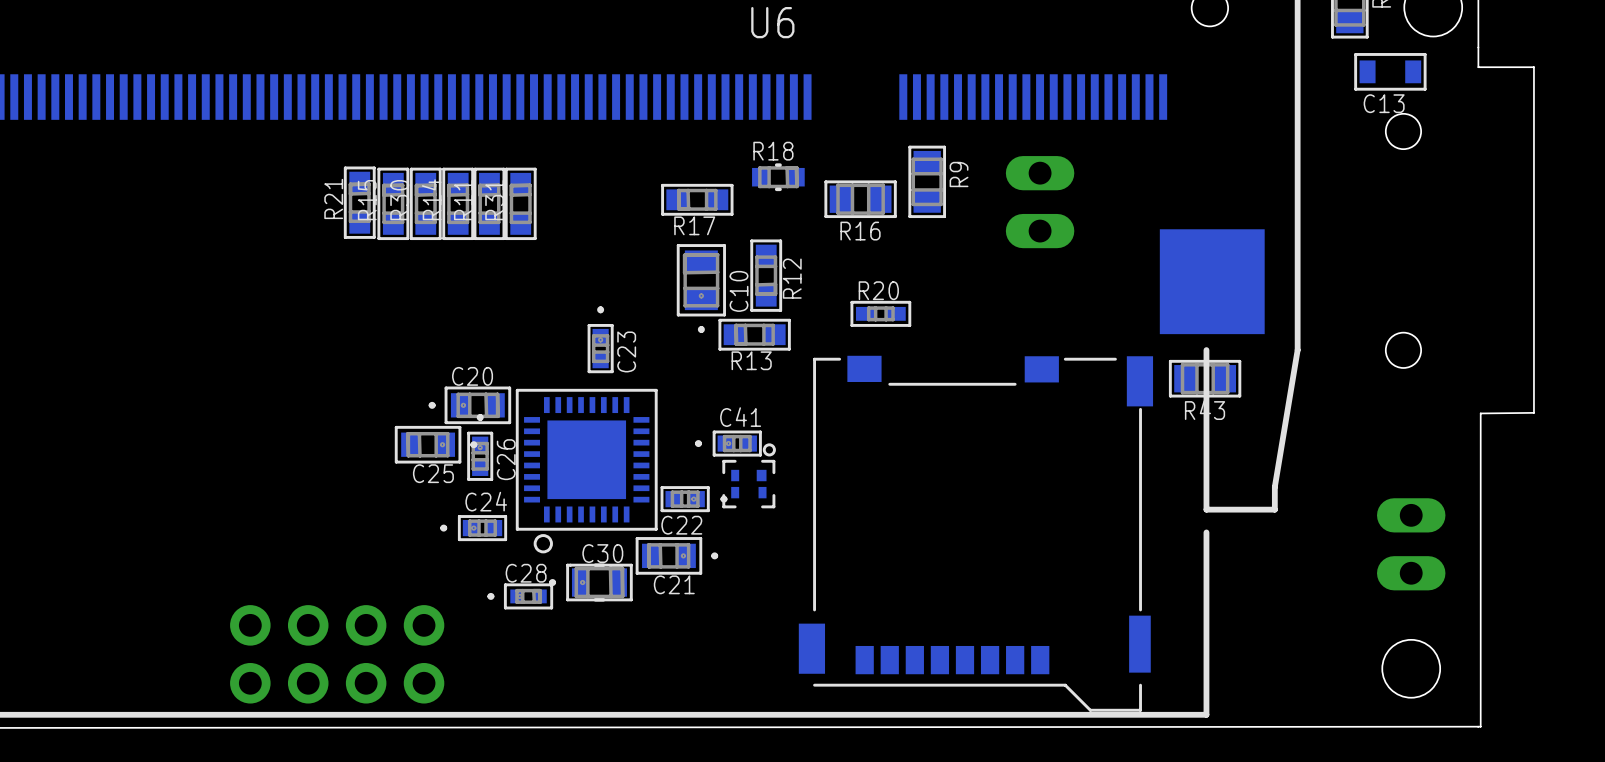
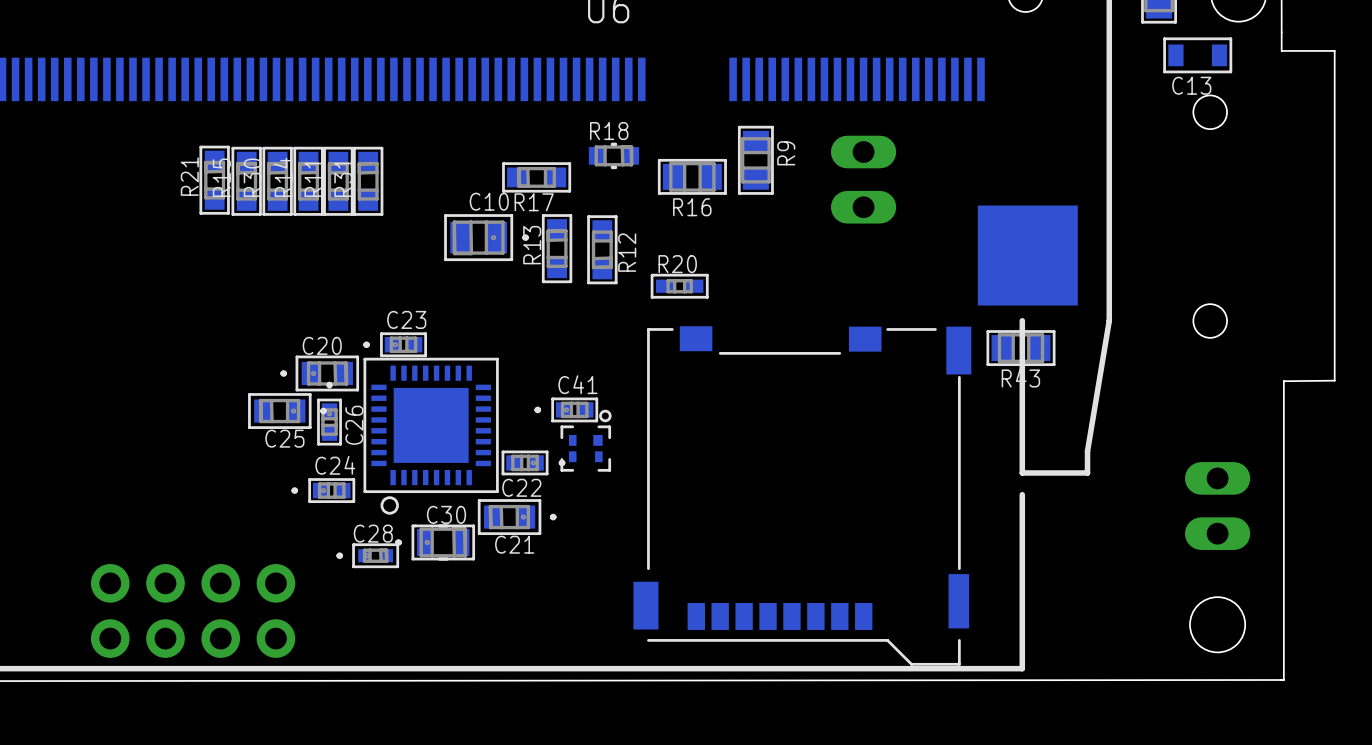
C10 rotation: 0° (701, 288) -> 90° counterclockwise (486, 237)
C10 position: (701, 288) -> (486, 237)
R20 position: (880, 313) -> (679, 286)
R13 rotation: 0° (754, 334) -> 90° clockwise (557, 248)
R13 position: (754, 334) -> (557, 248)
C23 rotation: 0° (600, 339) -> 90° counterclockwise (395, 344)
C23 position: (600, 339) -> (395, 344)

